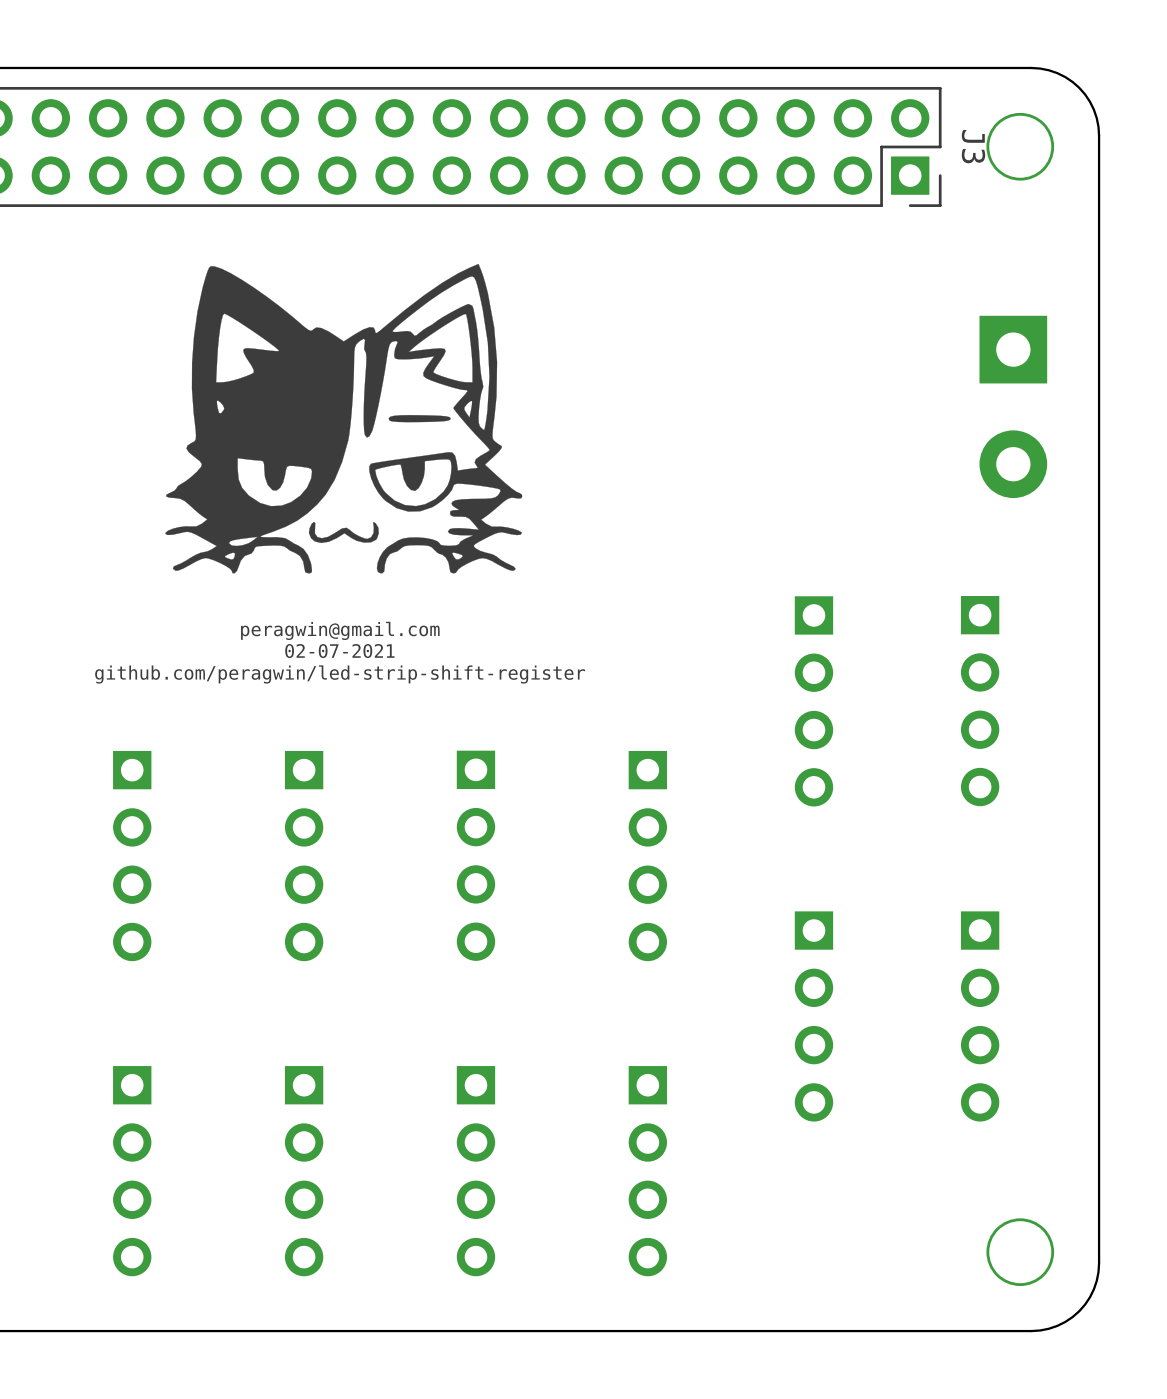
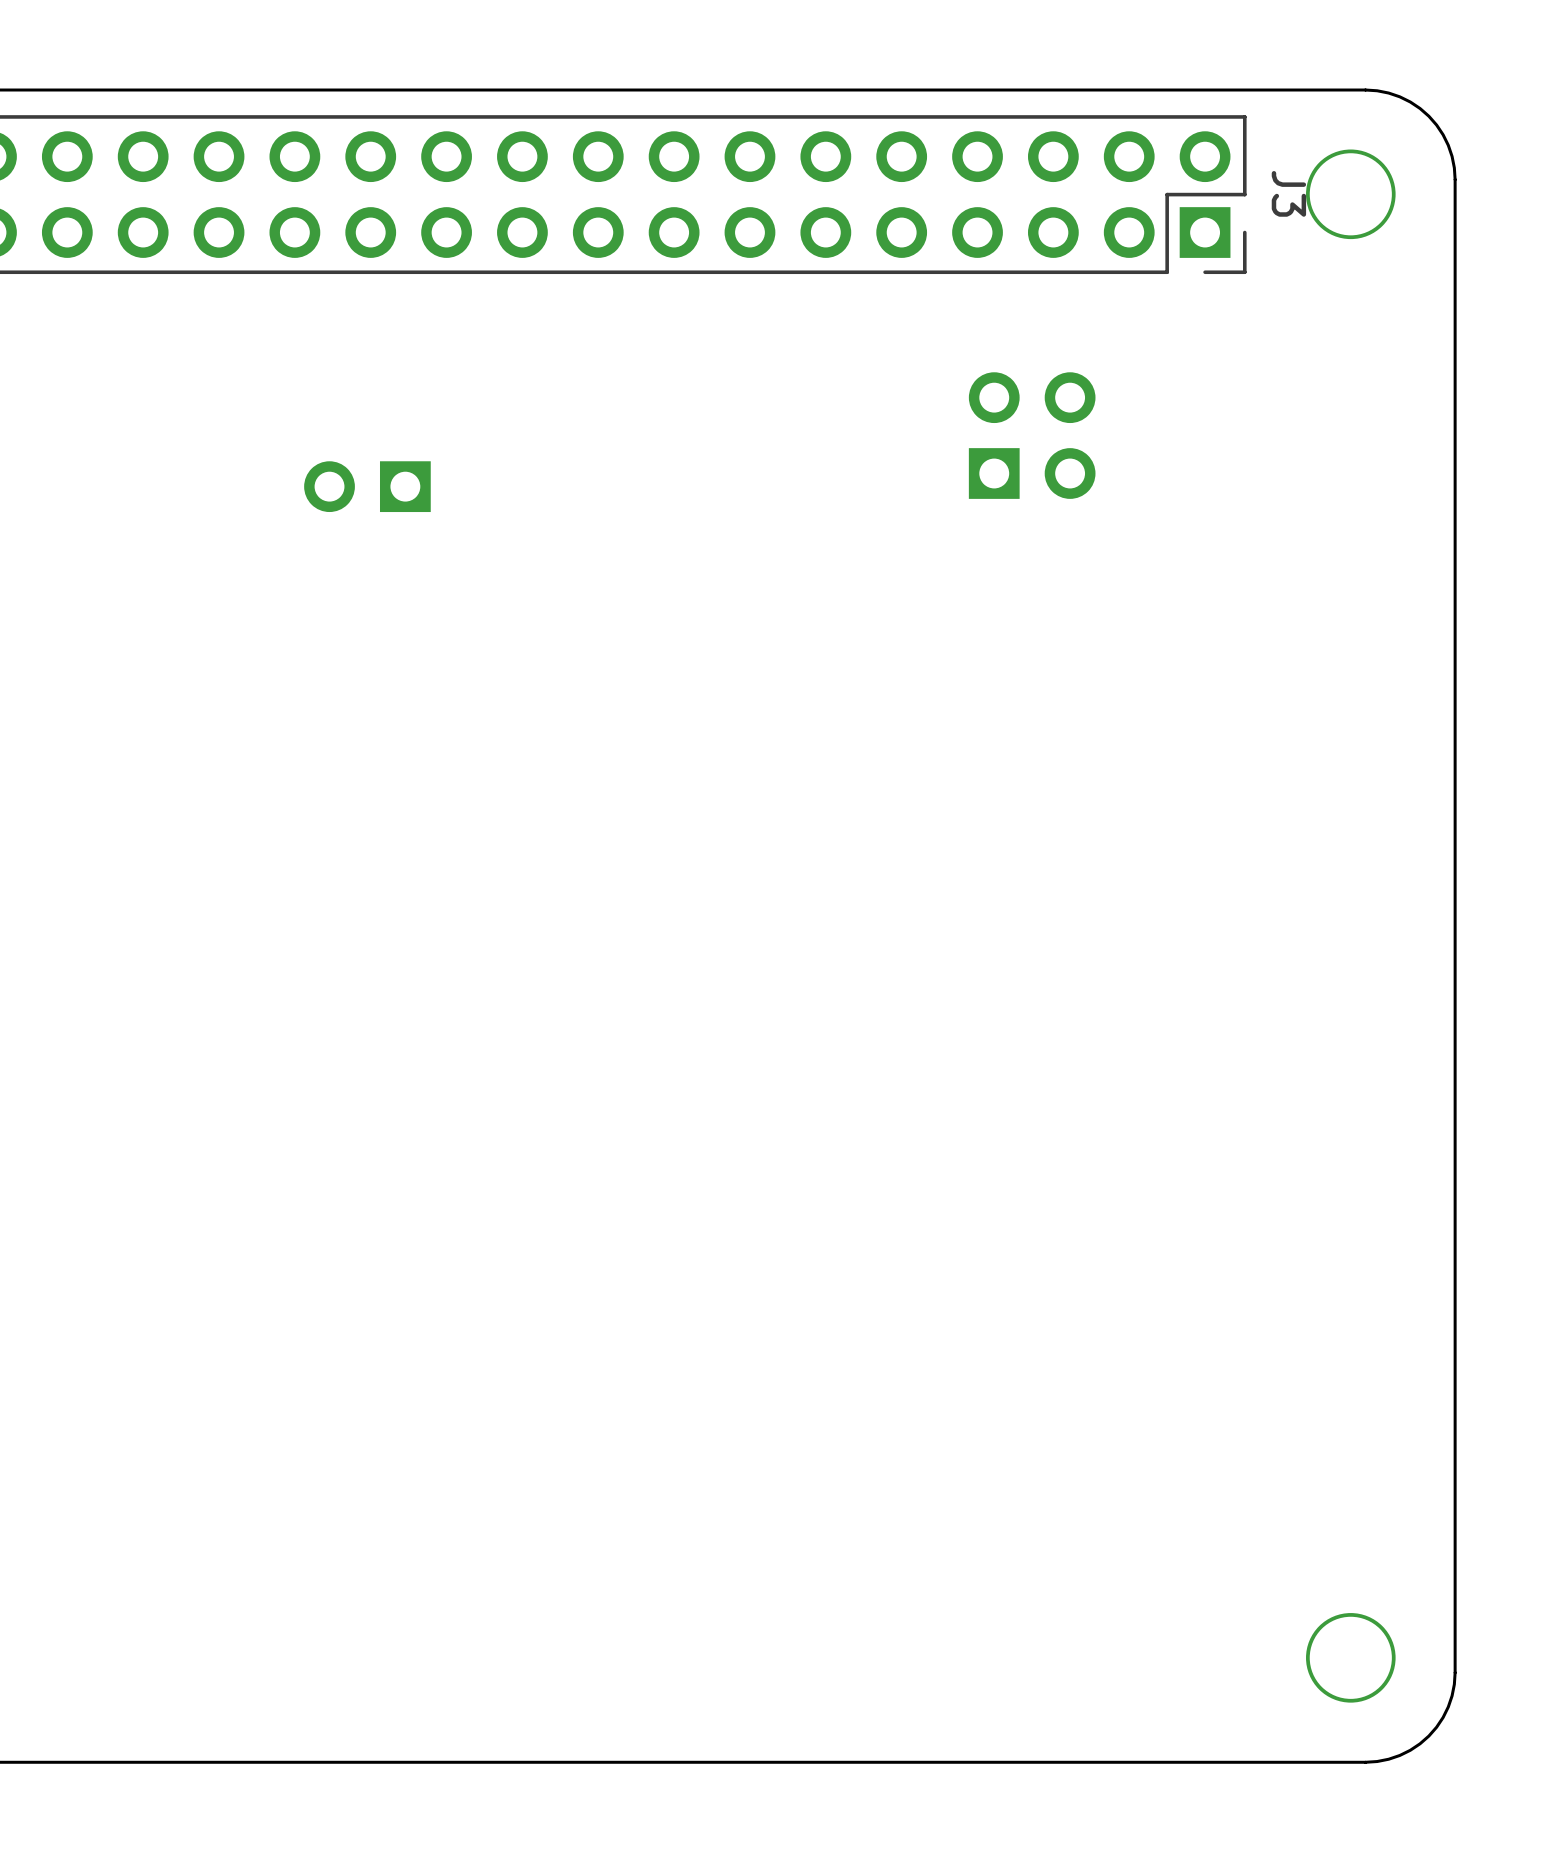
drawing: [165, 263, 523, 574] -> none
part: none -> (1032, 435)
part: none -> (367, 486)
part: (1013, 406) -> none
text: peragwin@gmail.com (340, 630) -> none
text: 02-07-2021 (339, 651) -> none
text: github.com/peragwin/led-strip-shift-register (340, 674) -> none
part: (813, 701) -> none
part: (980, 701) -> none
part: (475, 855) -> none
part: (132, 856) -> none
part: (304, 856) -> none
part: (647, 856) -> none
part: (813, 1016) -> none
part: (980, 1016) -> none
part: (132, 1171) -> none
part: (304, 1171) -> none
part: (475, 1171) -> none
part: (647, 1171) -> none

